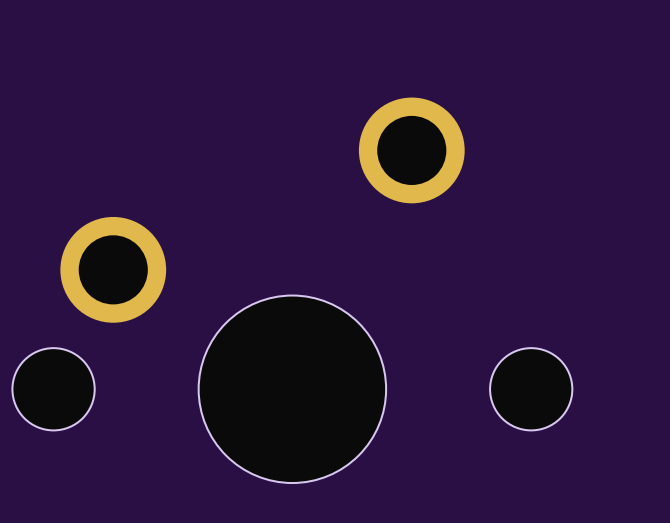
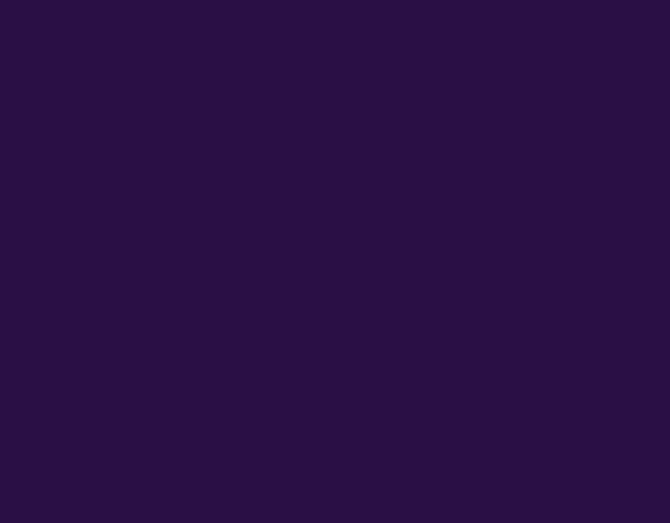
part: (292, 290) -> none

